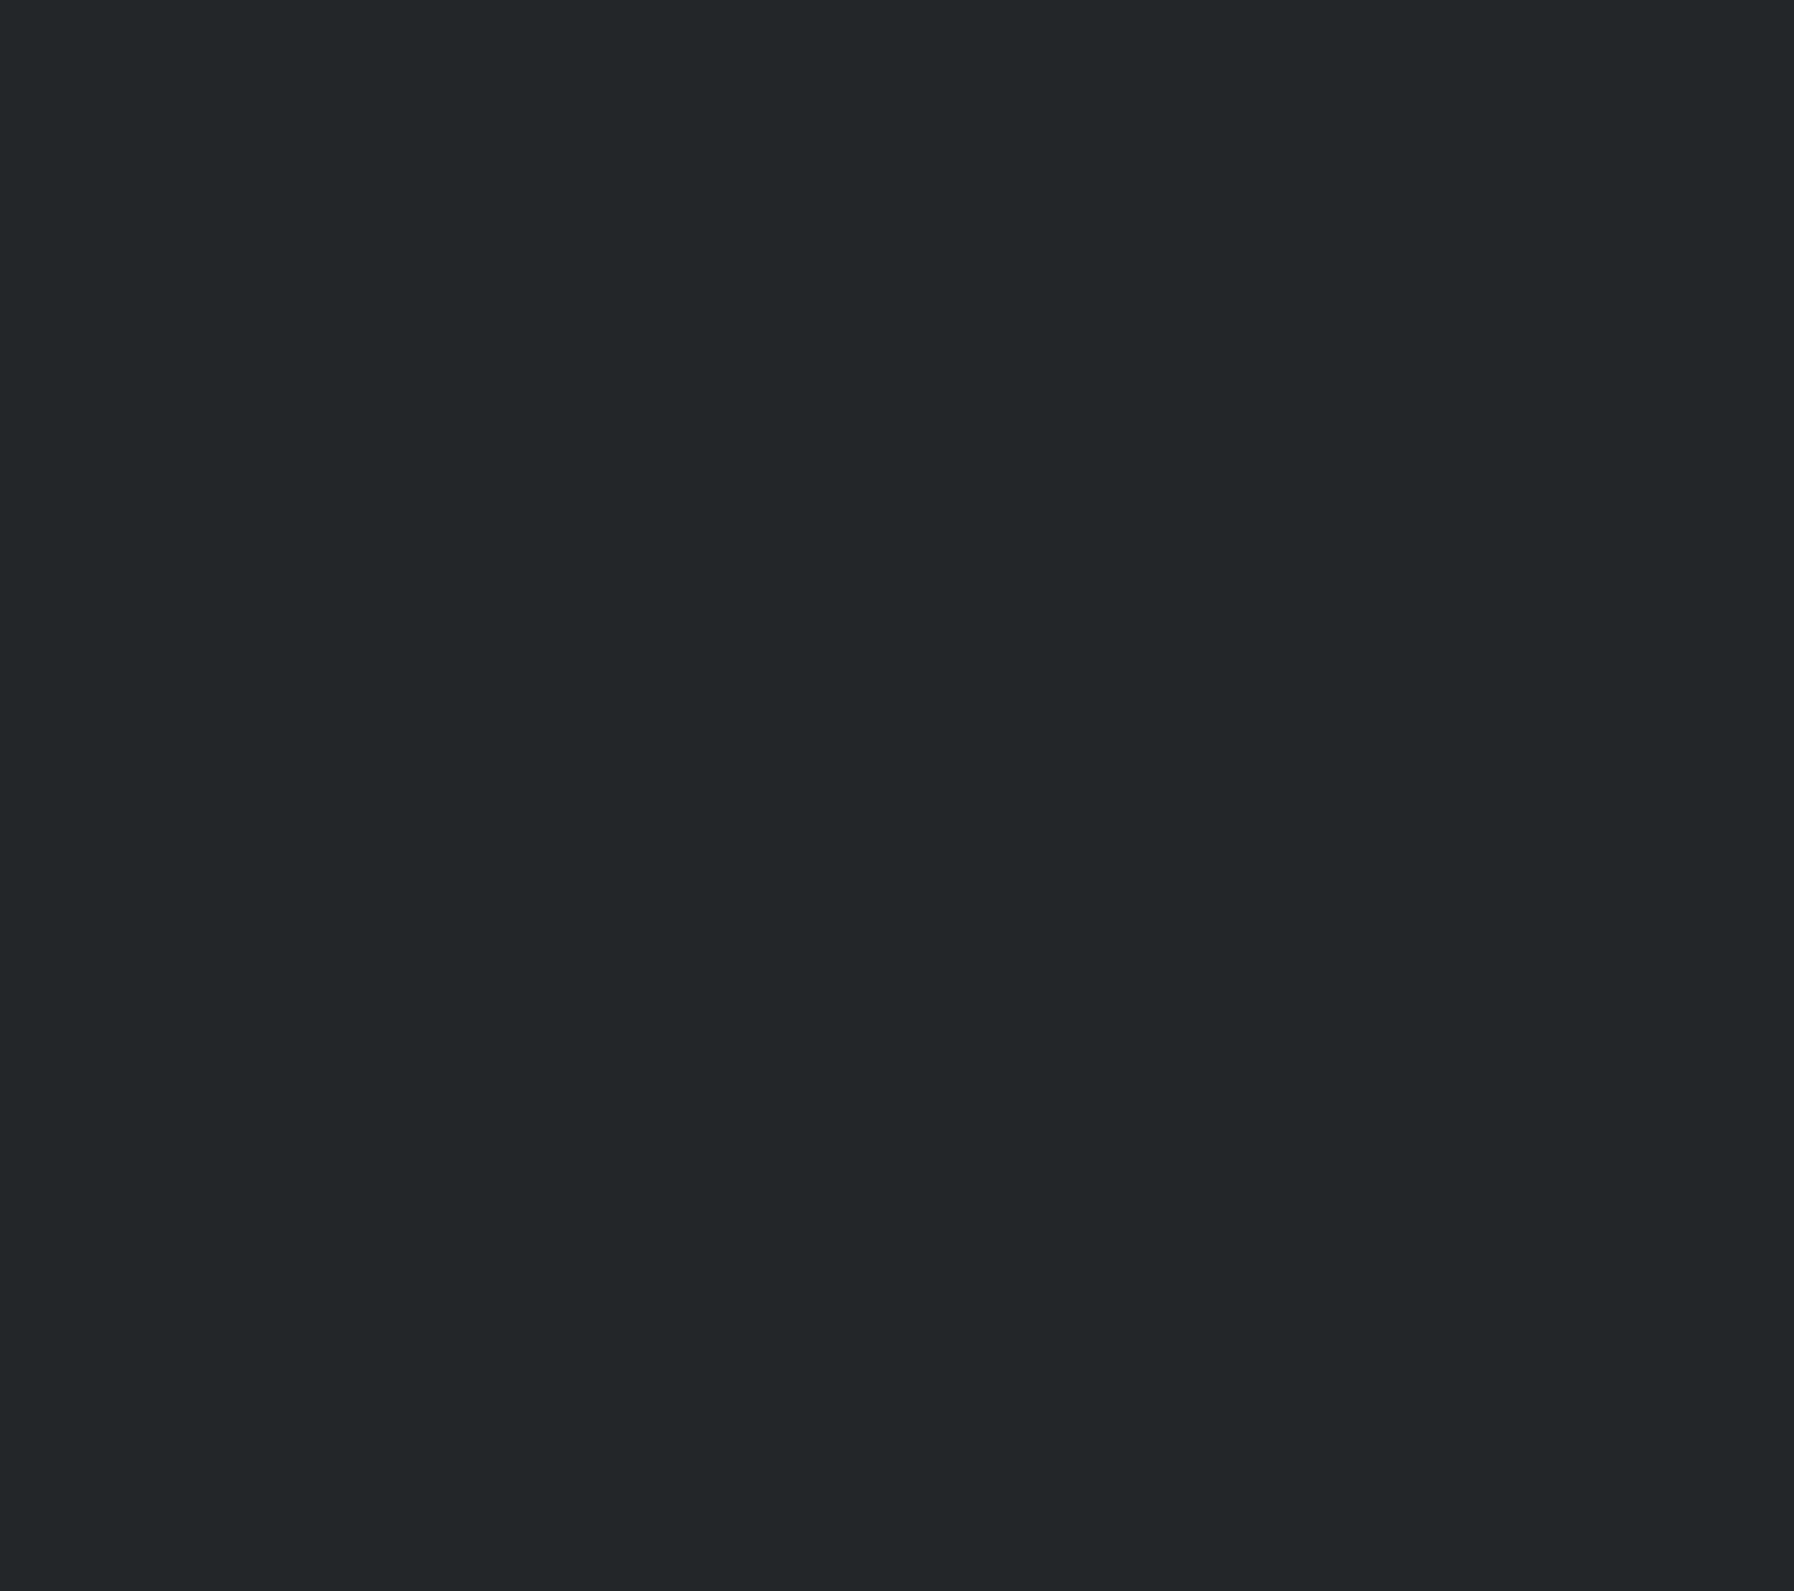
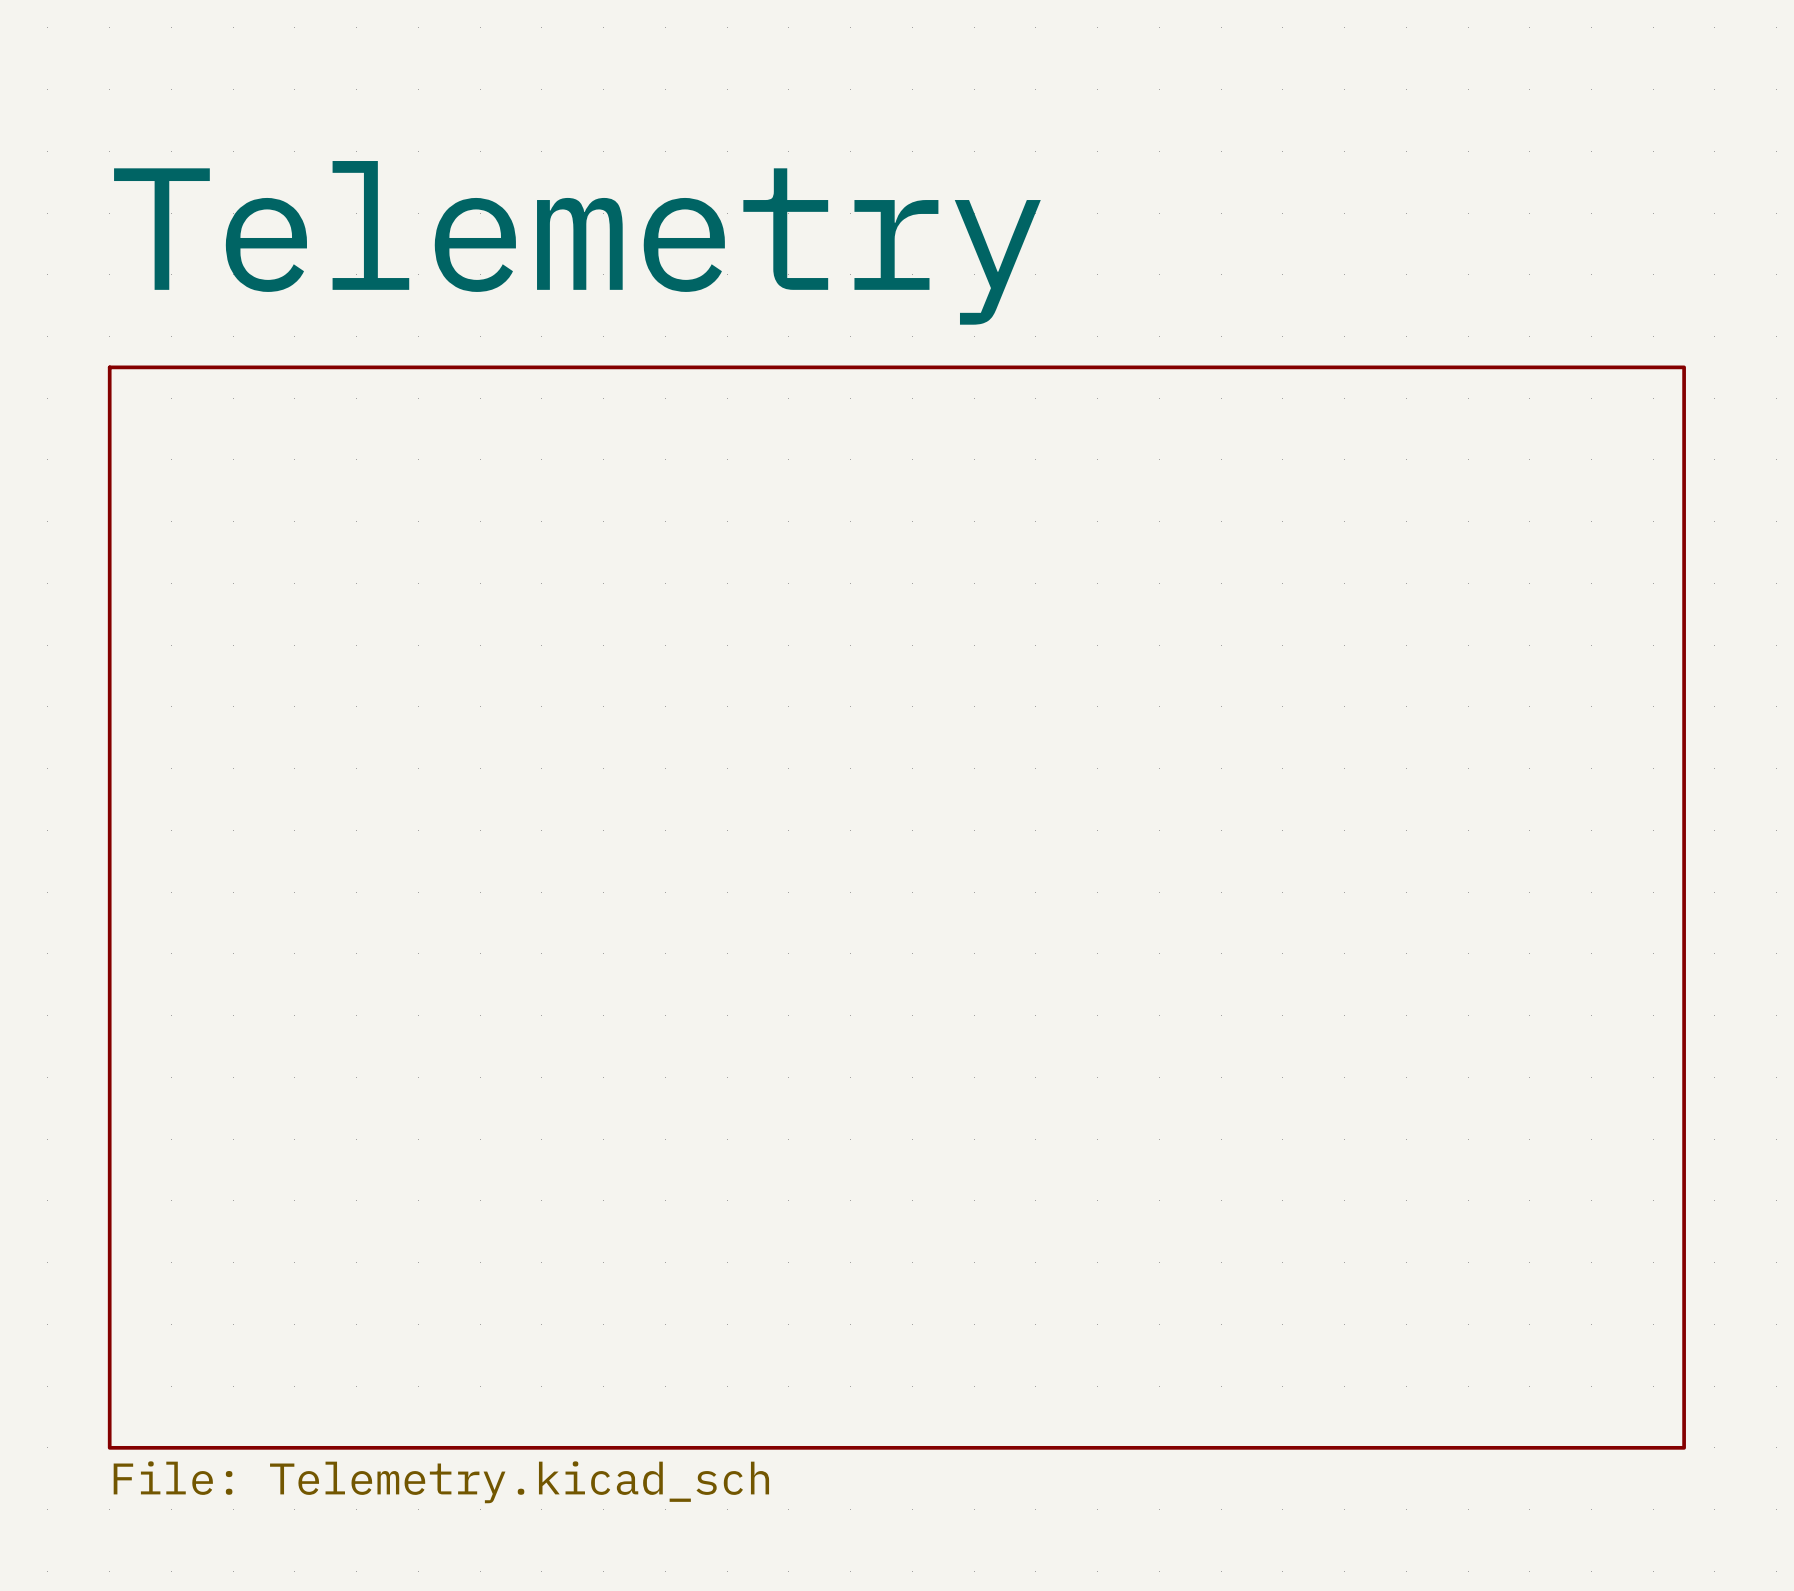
sheet Telemetry: none -> File: Telemetry.kicad_sch (896, 907)

